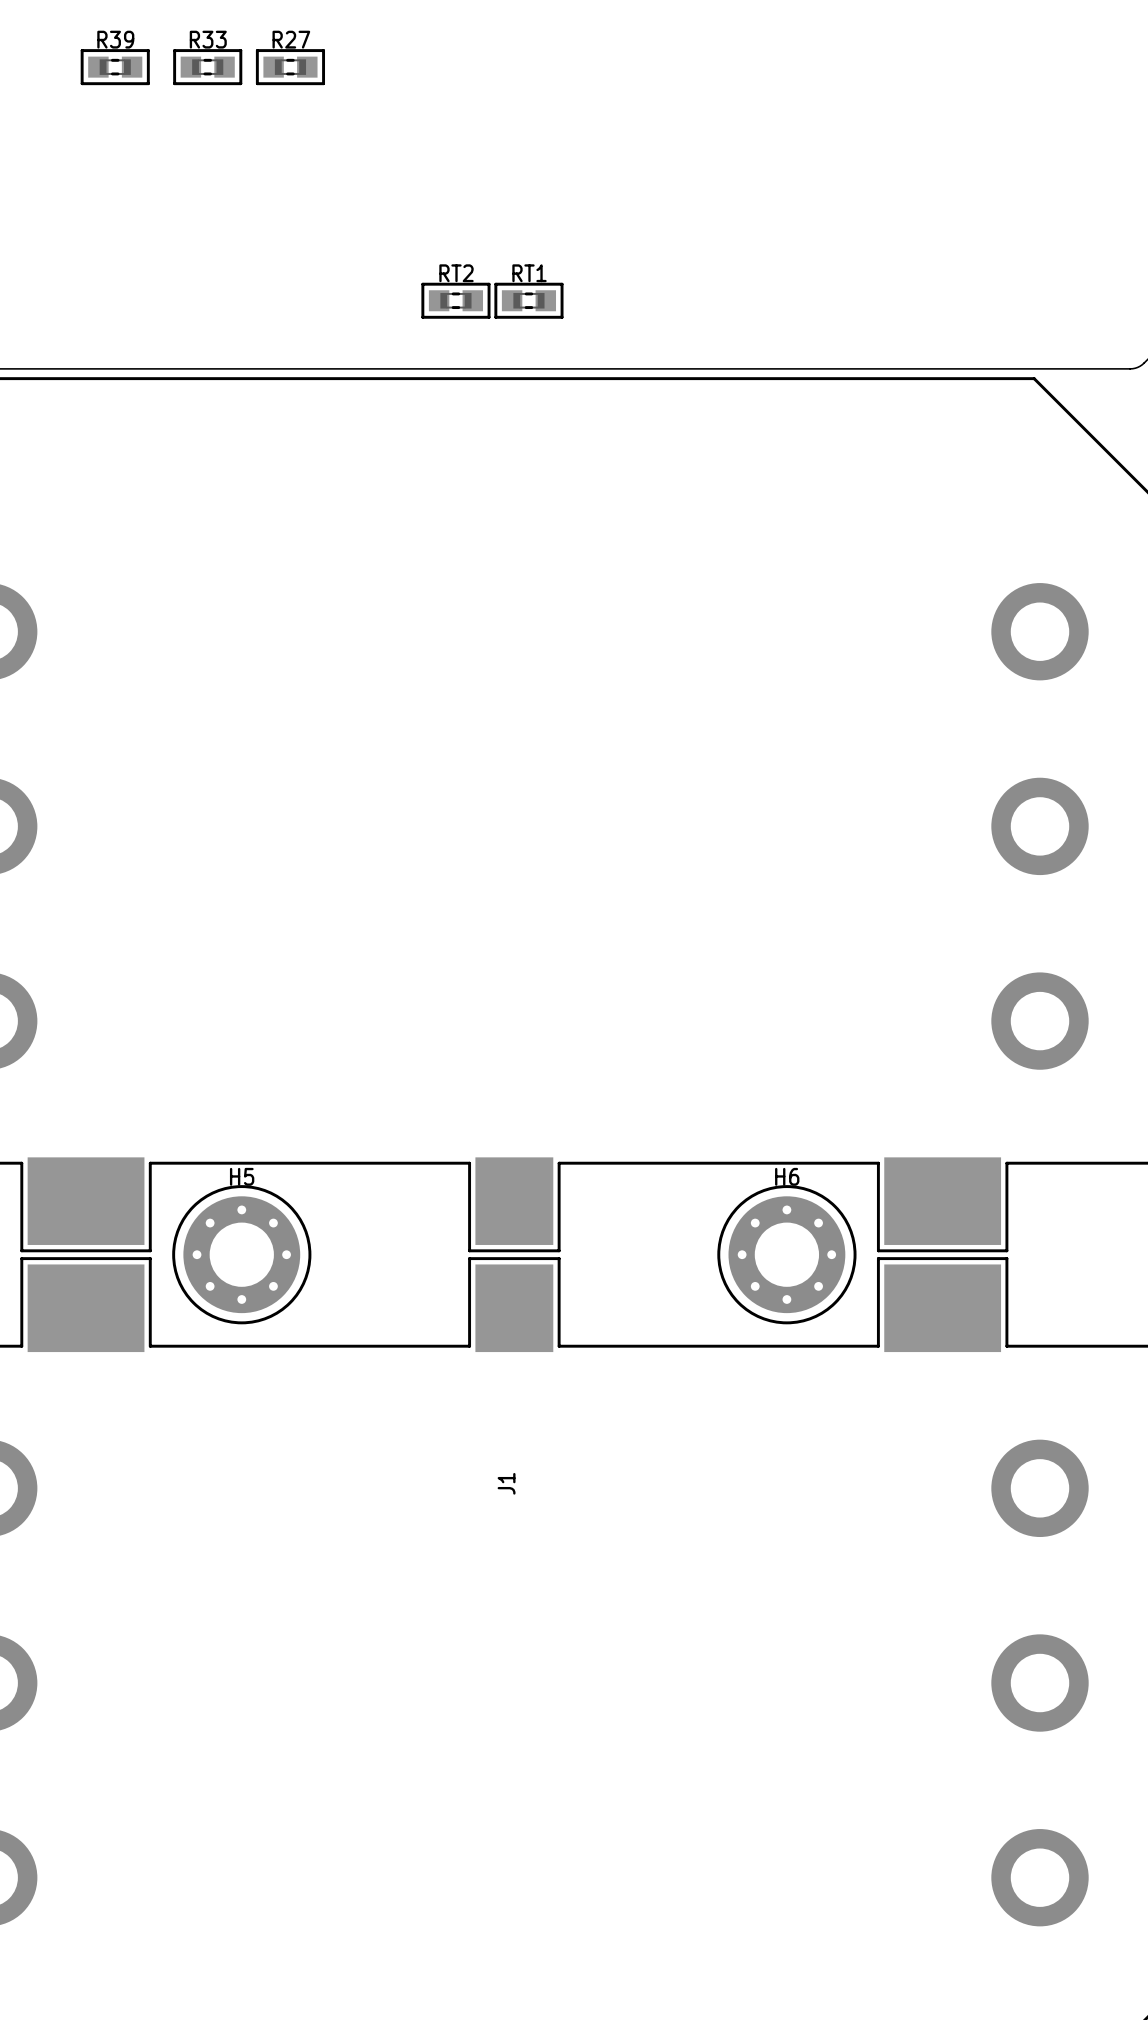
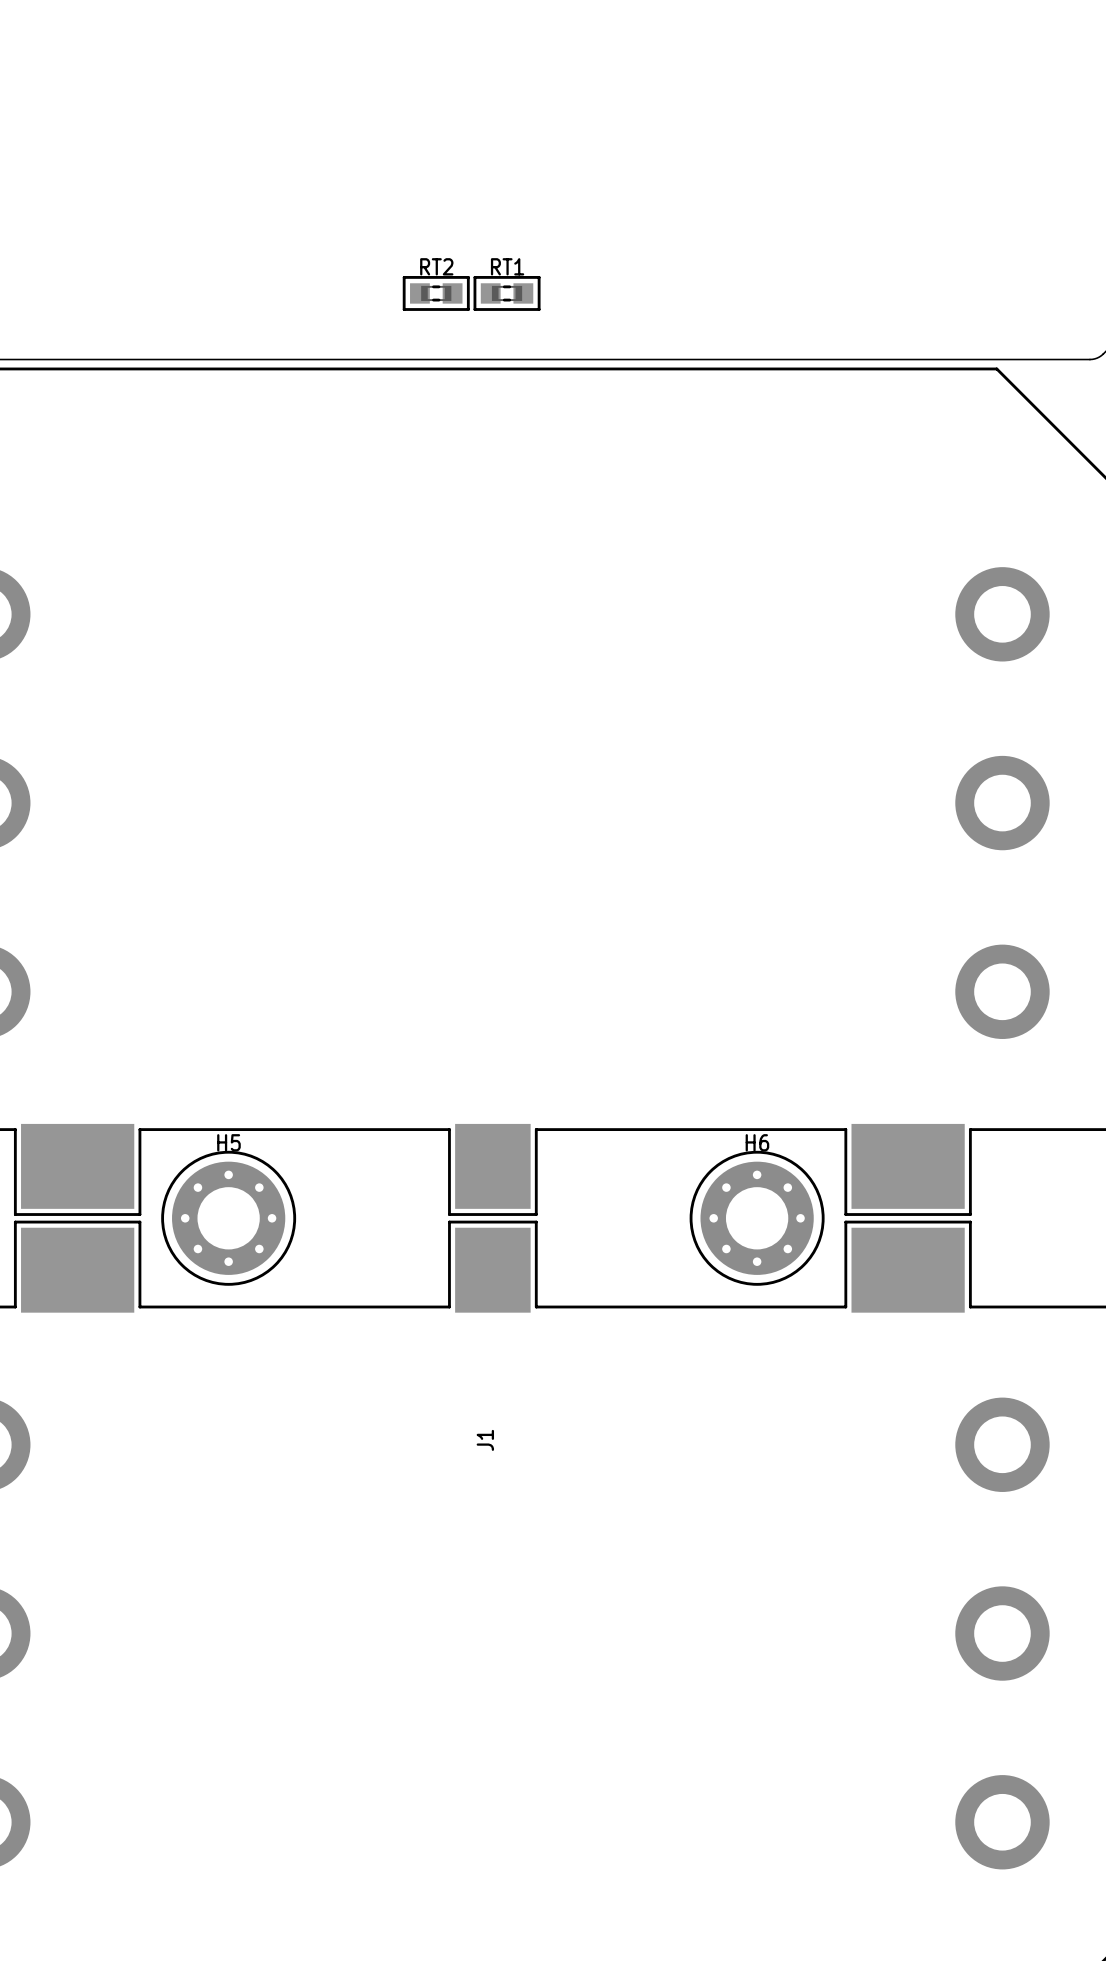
R39: (115, 67) -> none
R33: (207, 67) -> none
R27: (290, 67) -> none

